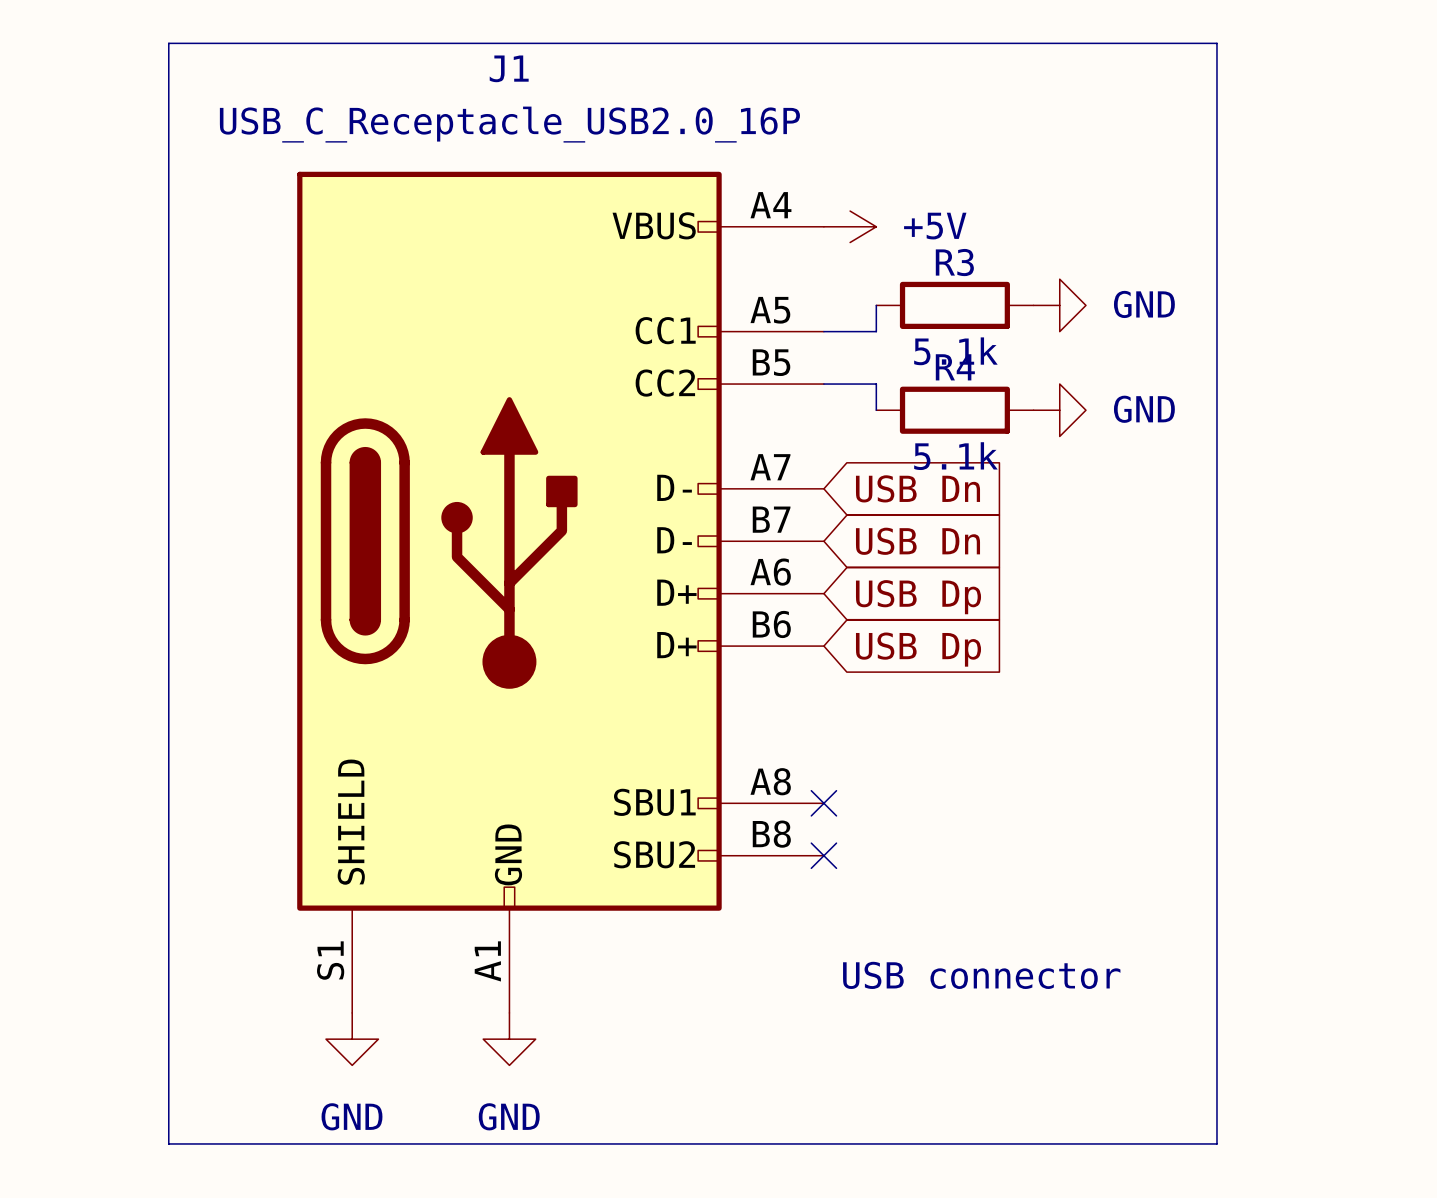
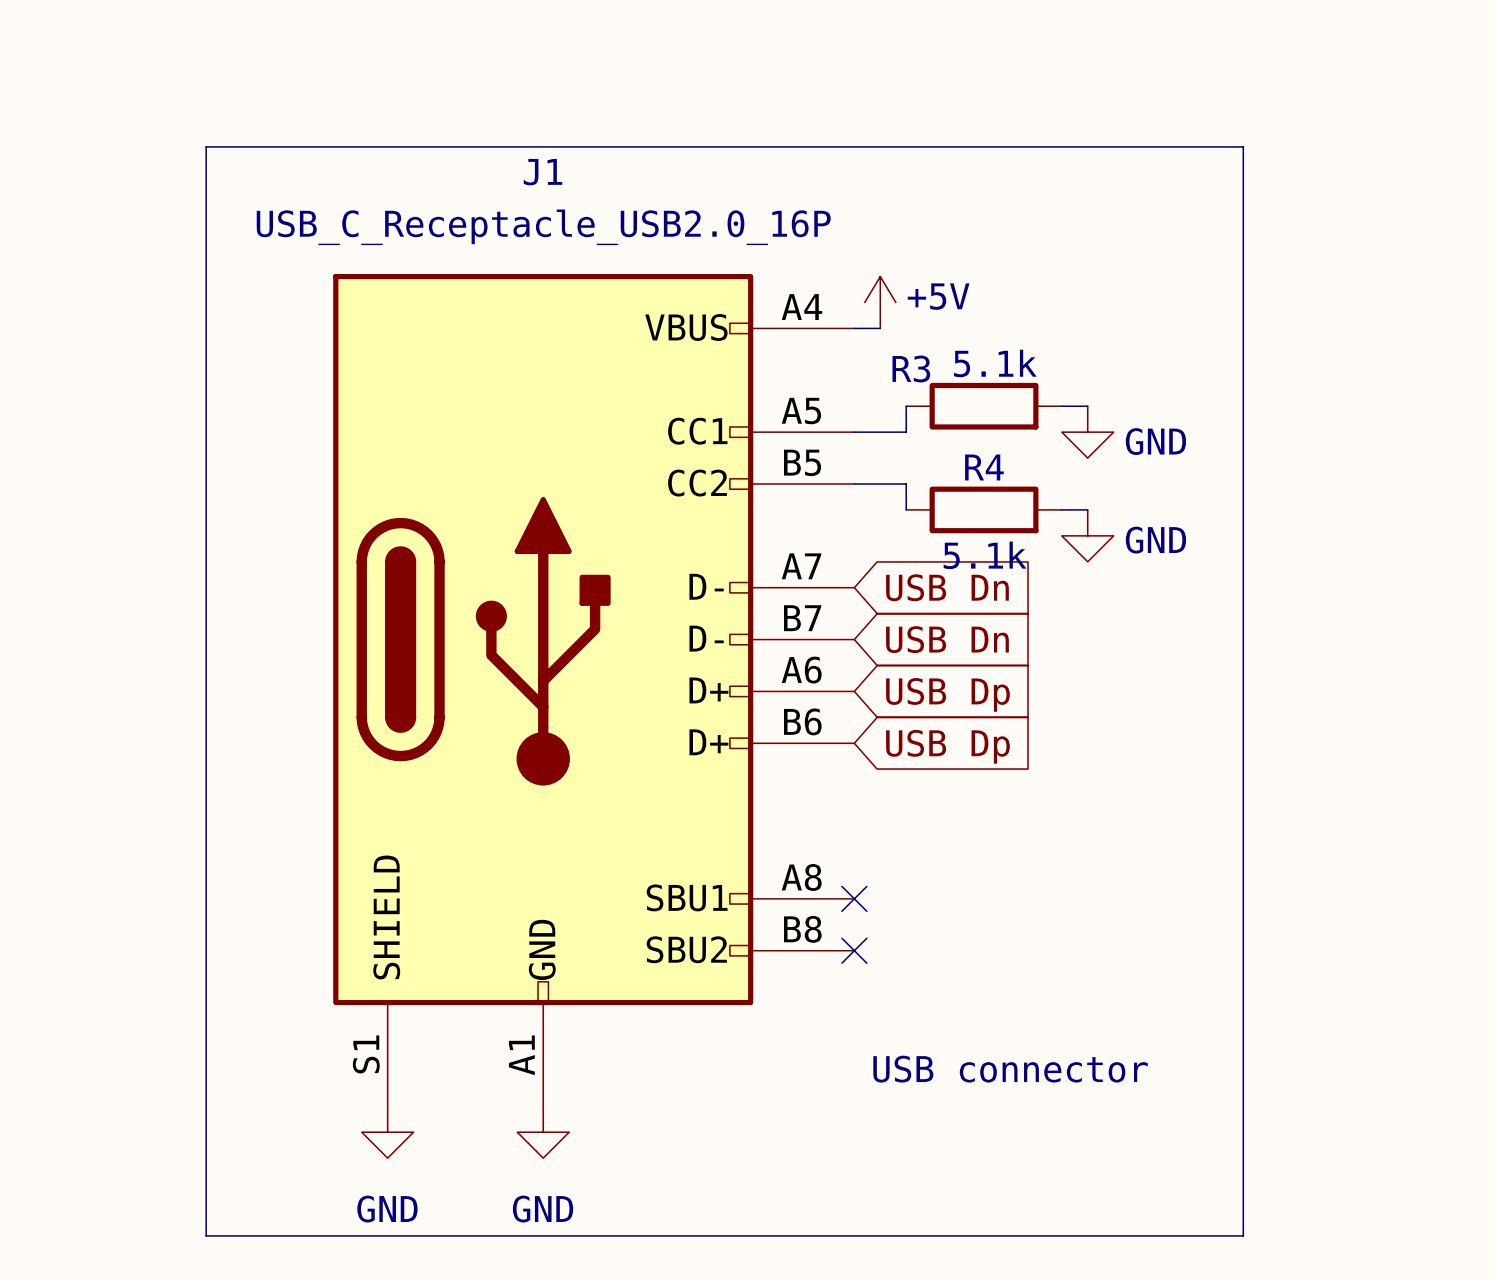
power symbol rotation: 0° (850, 226) -> 90° counterclockwise (880, 302)
R3 name position: R3 (954, 262) -> R3 (911, 368)
power symbol rotation: 0° (1059, 305) -> 90° clockwise (1087, 432)
R3 value position: 5.1k (955, 351) -> 5.1k (995, 363)
power symbol rotation: 0° (1059, 410) -> 90° clockwise (1087, 535)

